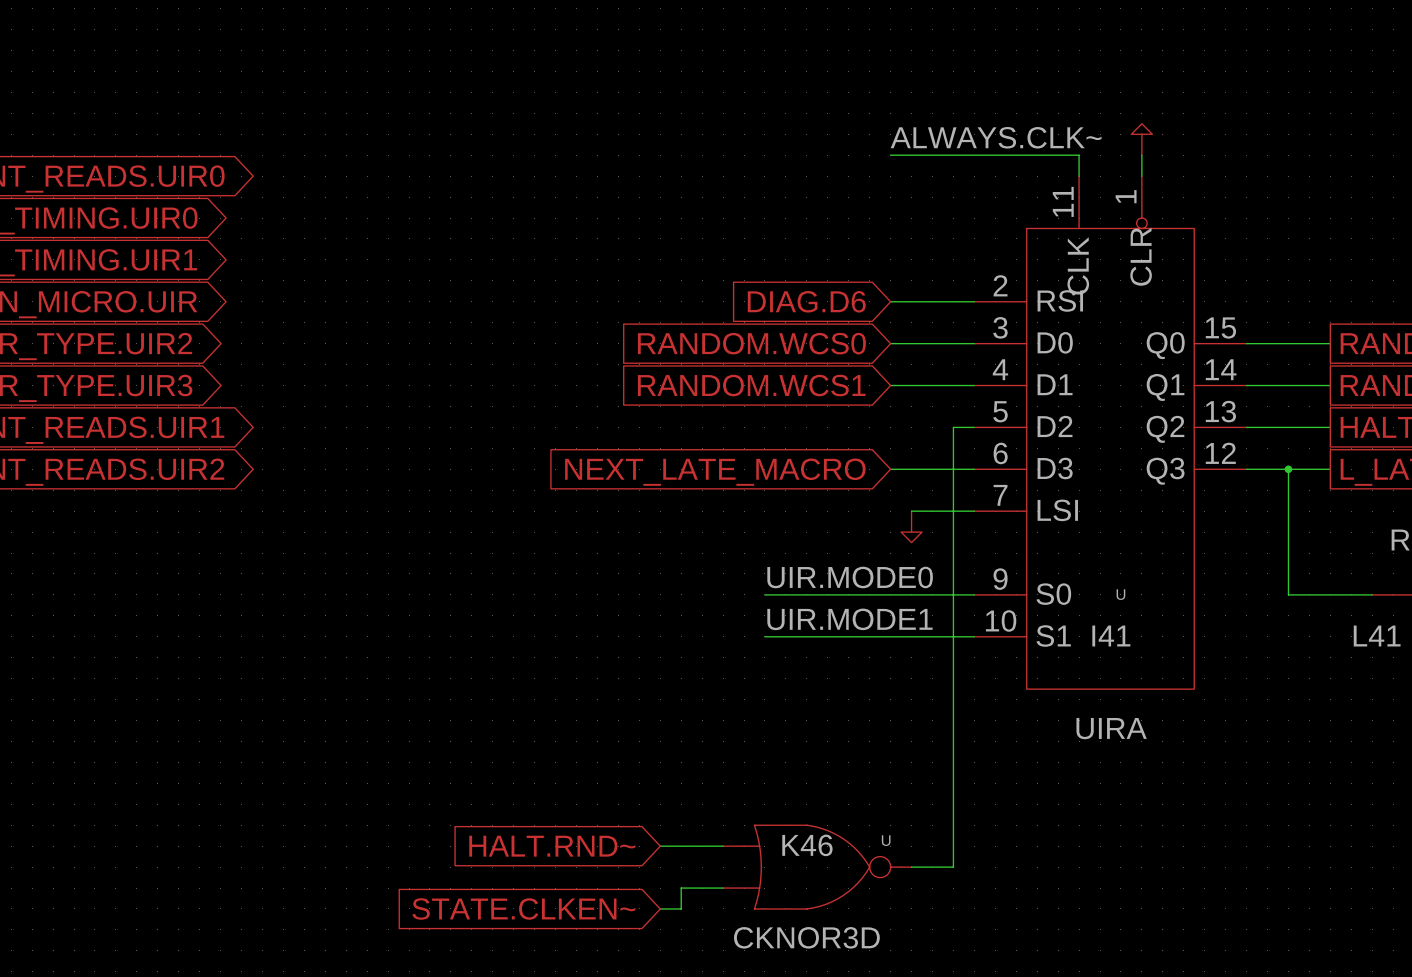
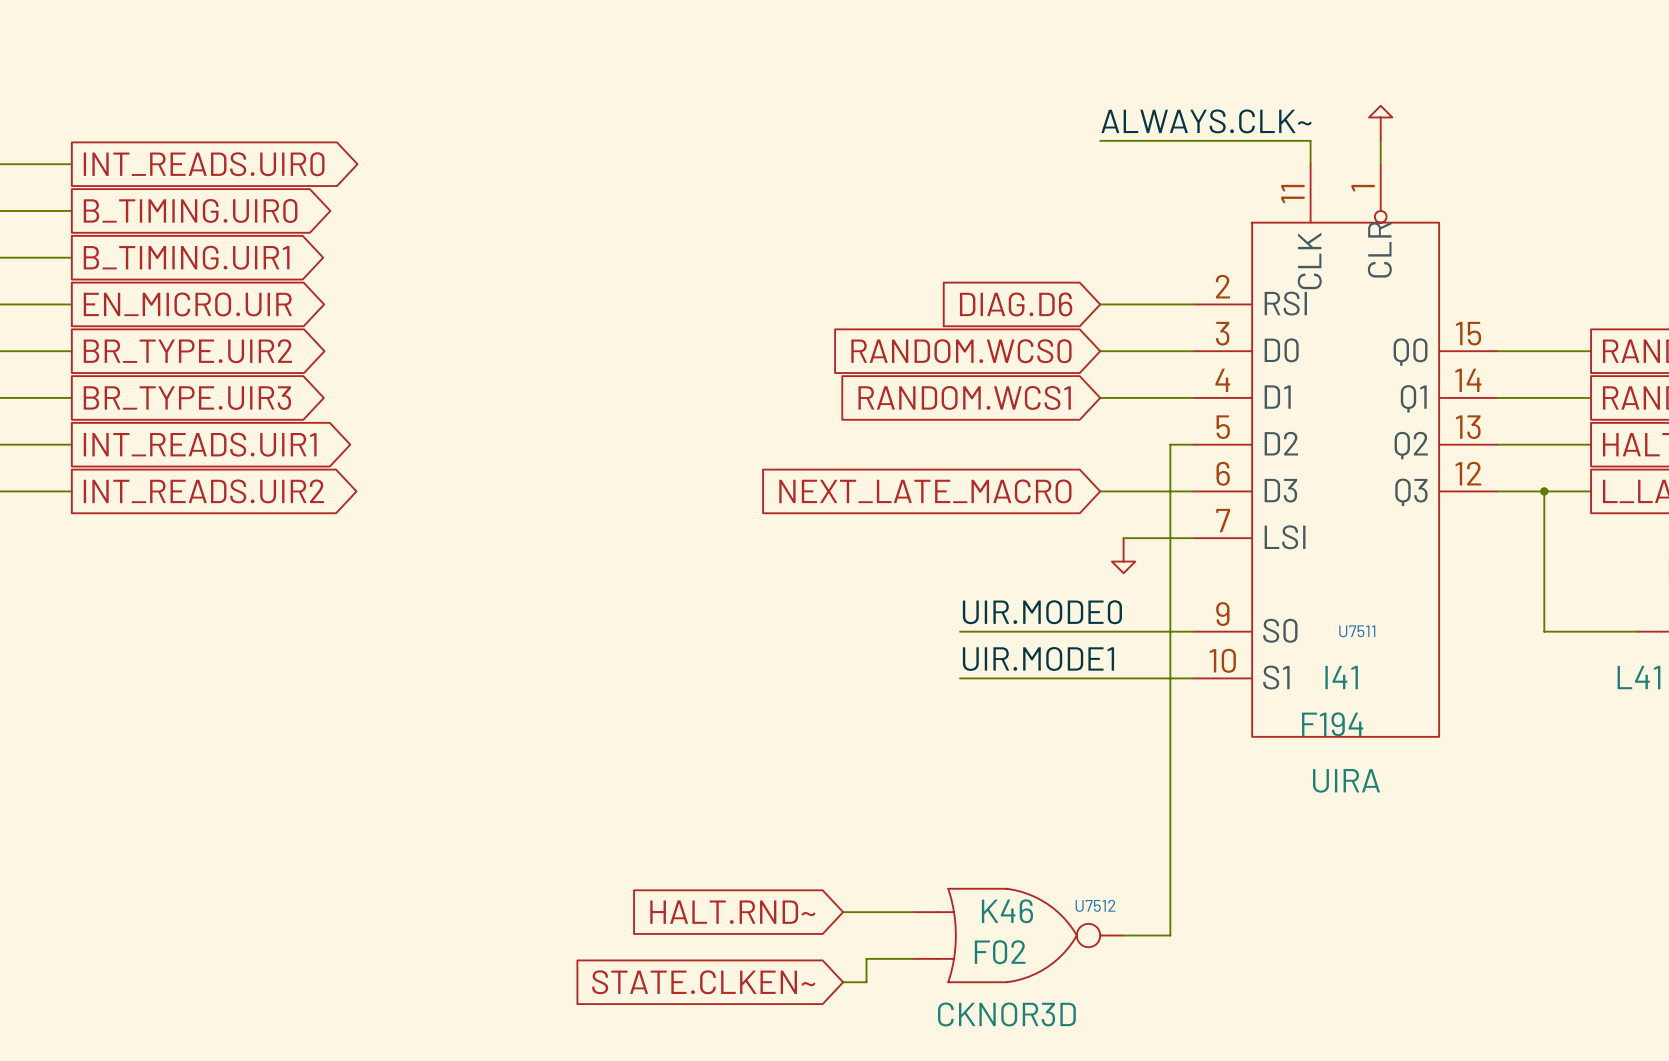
U name: U (1120, 594) -> U7511 (1357, 631)
U value: none -> F194 (1332, 724)
U name: U (886, 840) -> U7512 (1095, 905)
U value: none -> F02 (1000, 952)

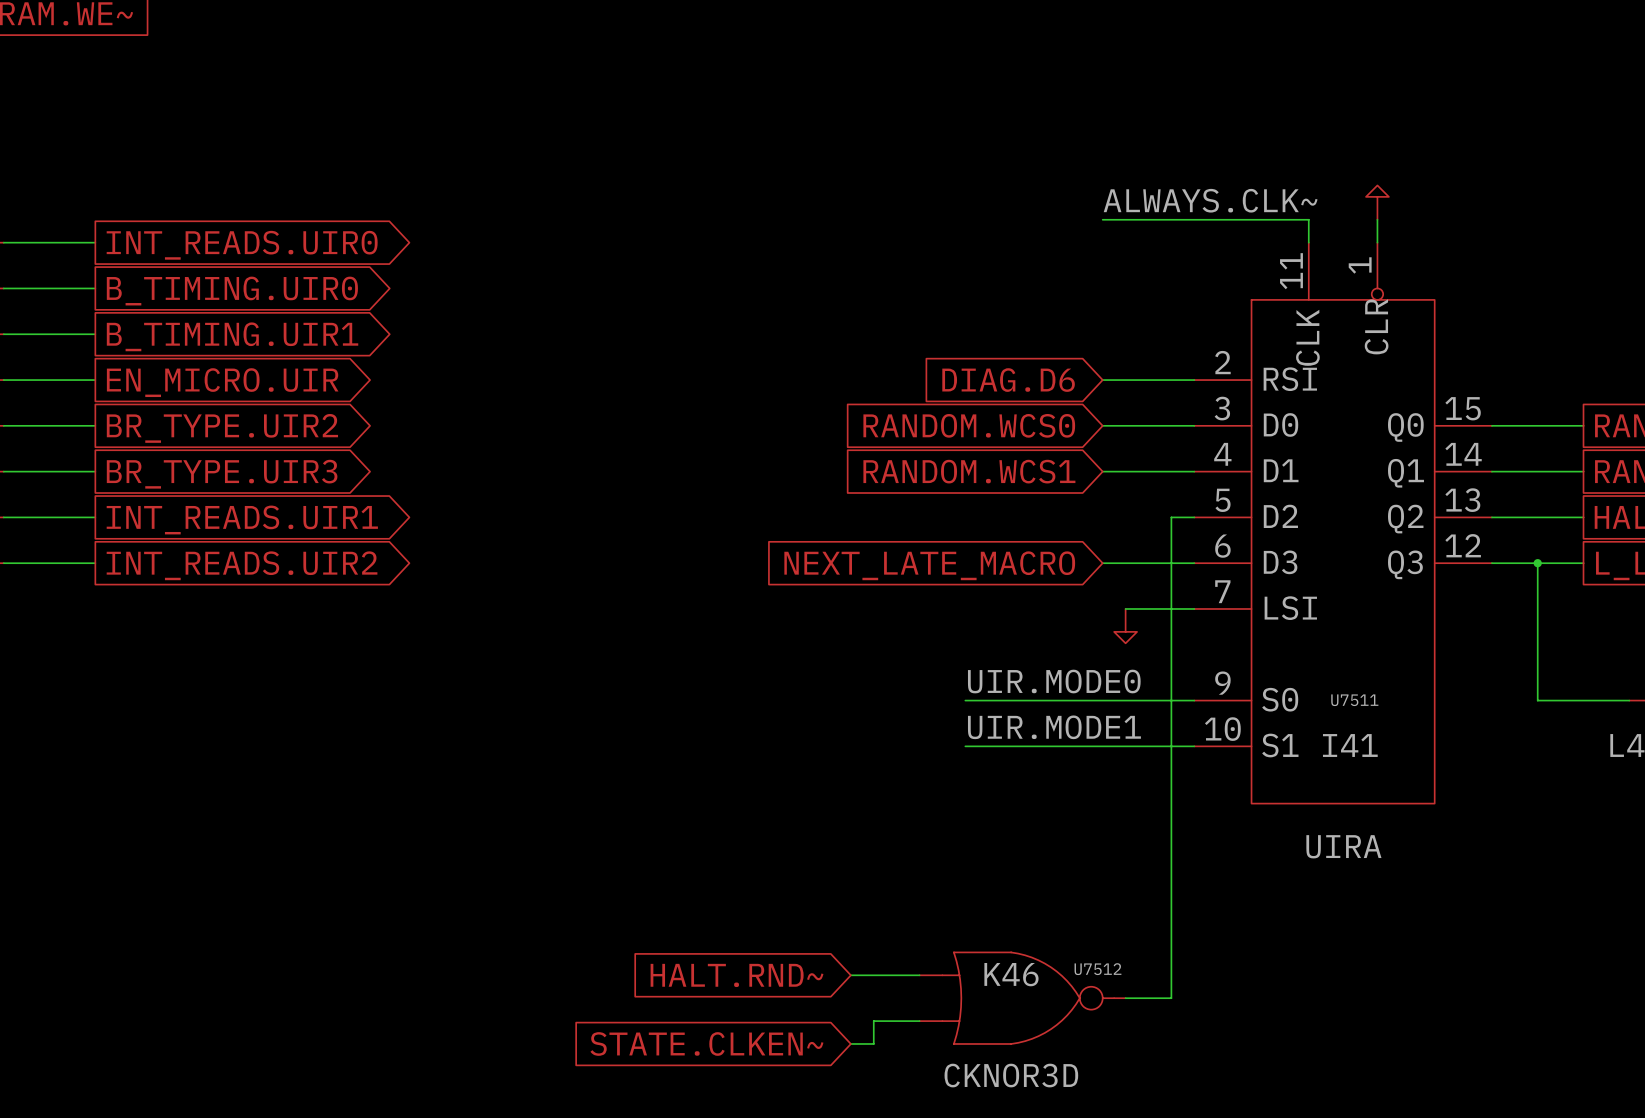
U7511 value: F194 (1332, 724) -> none
U7512 value: F02 (1000, 952) -> none

